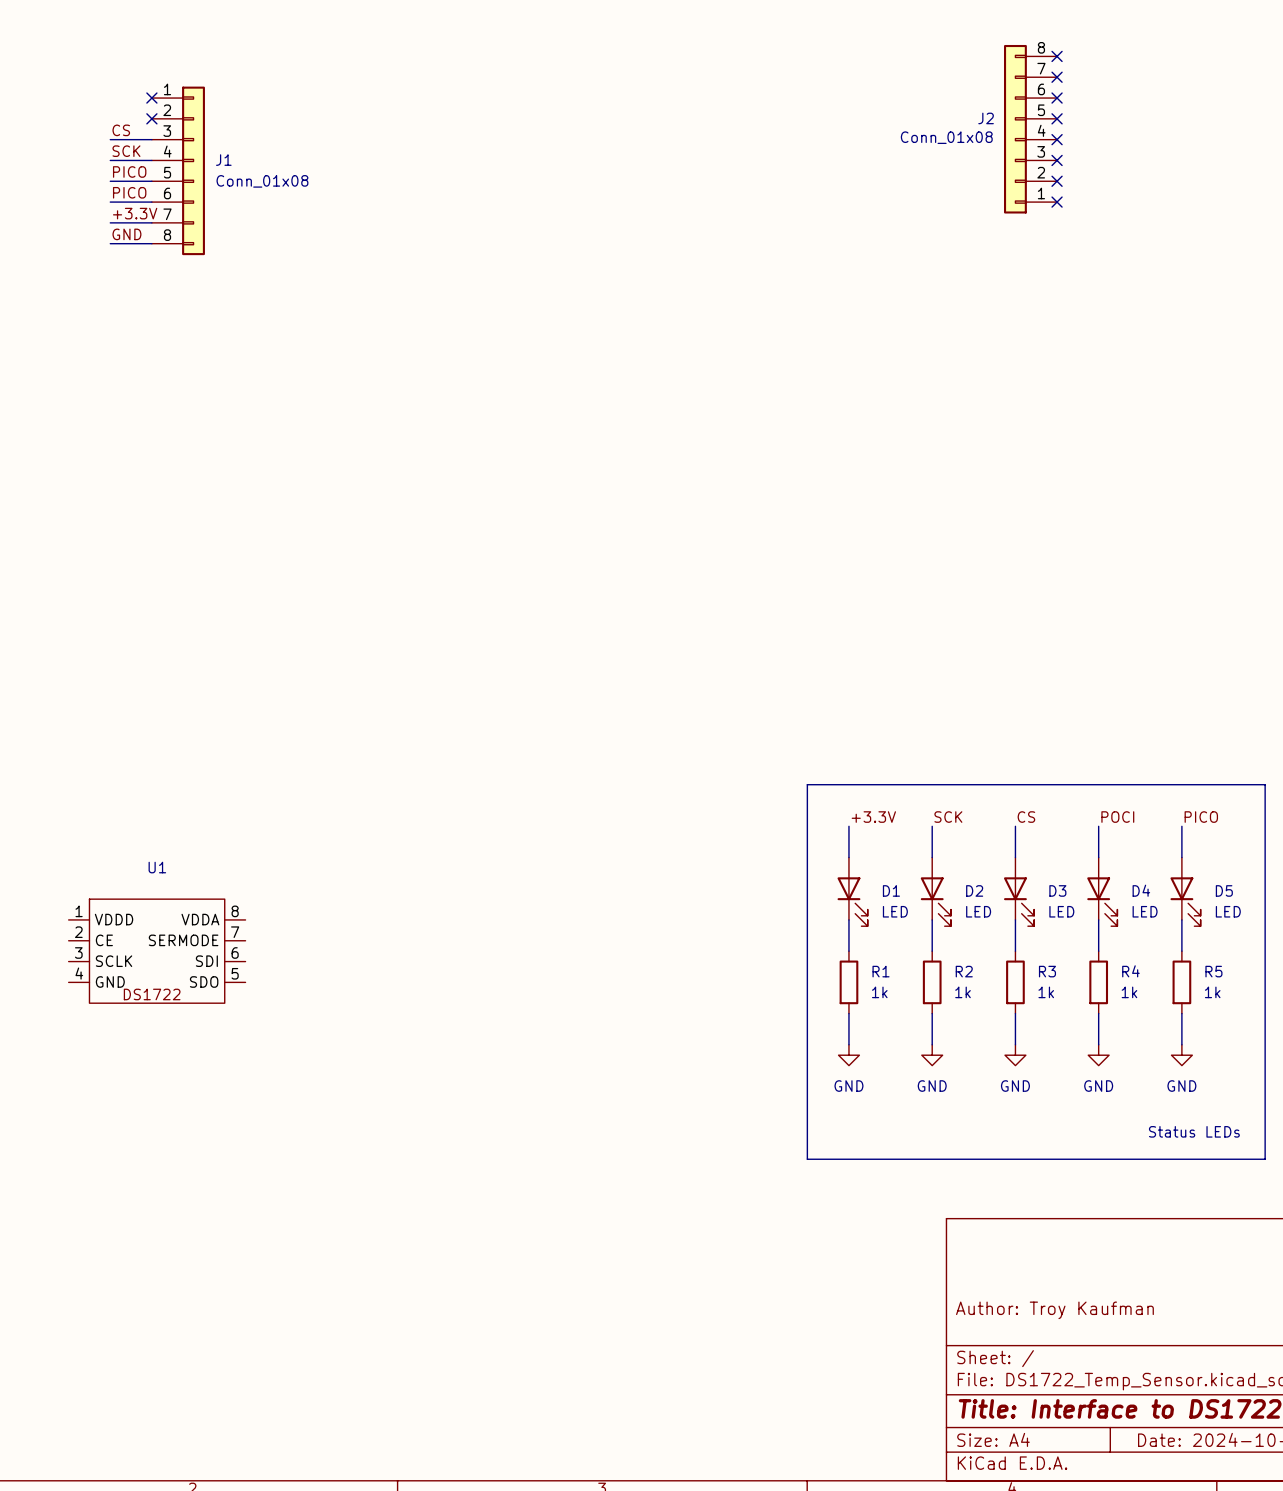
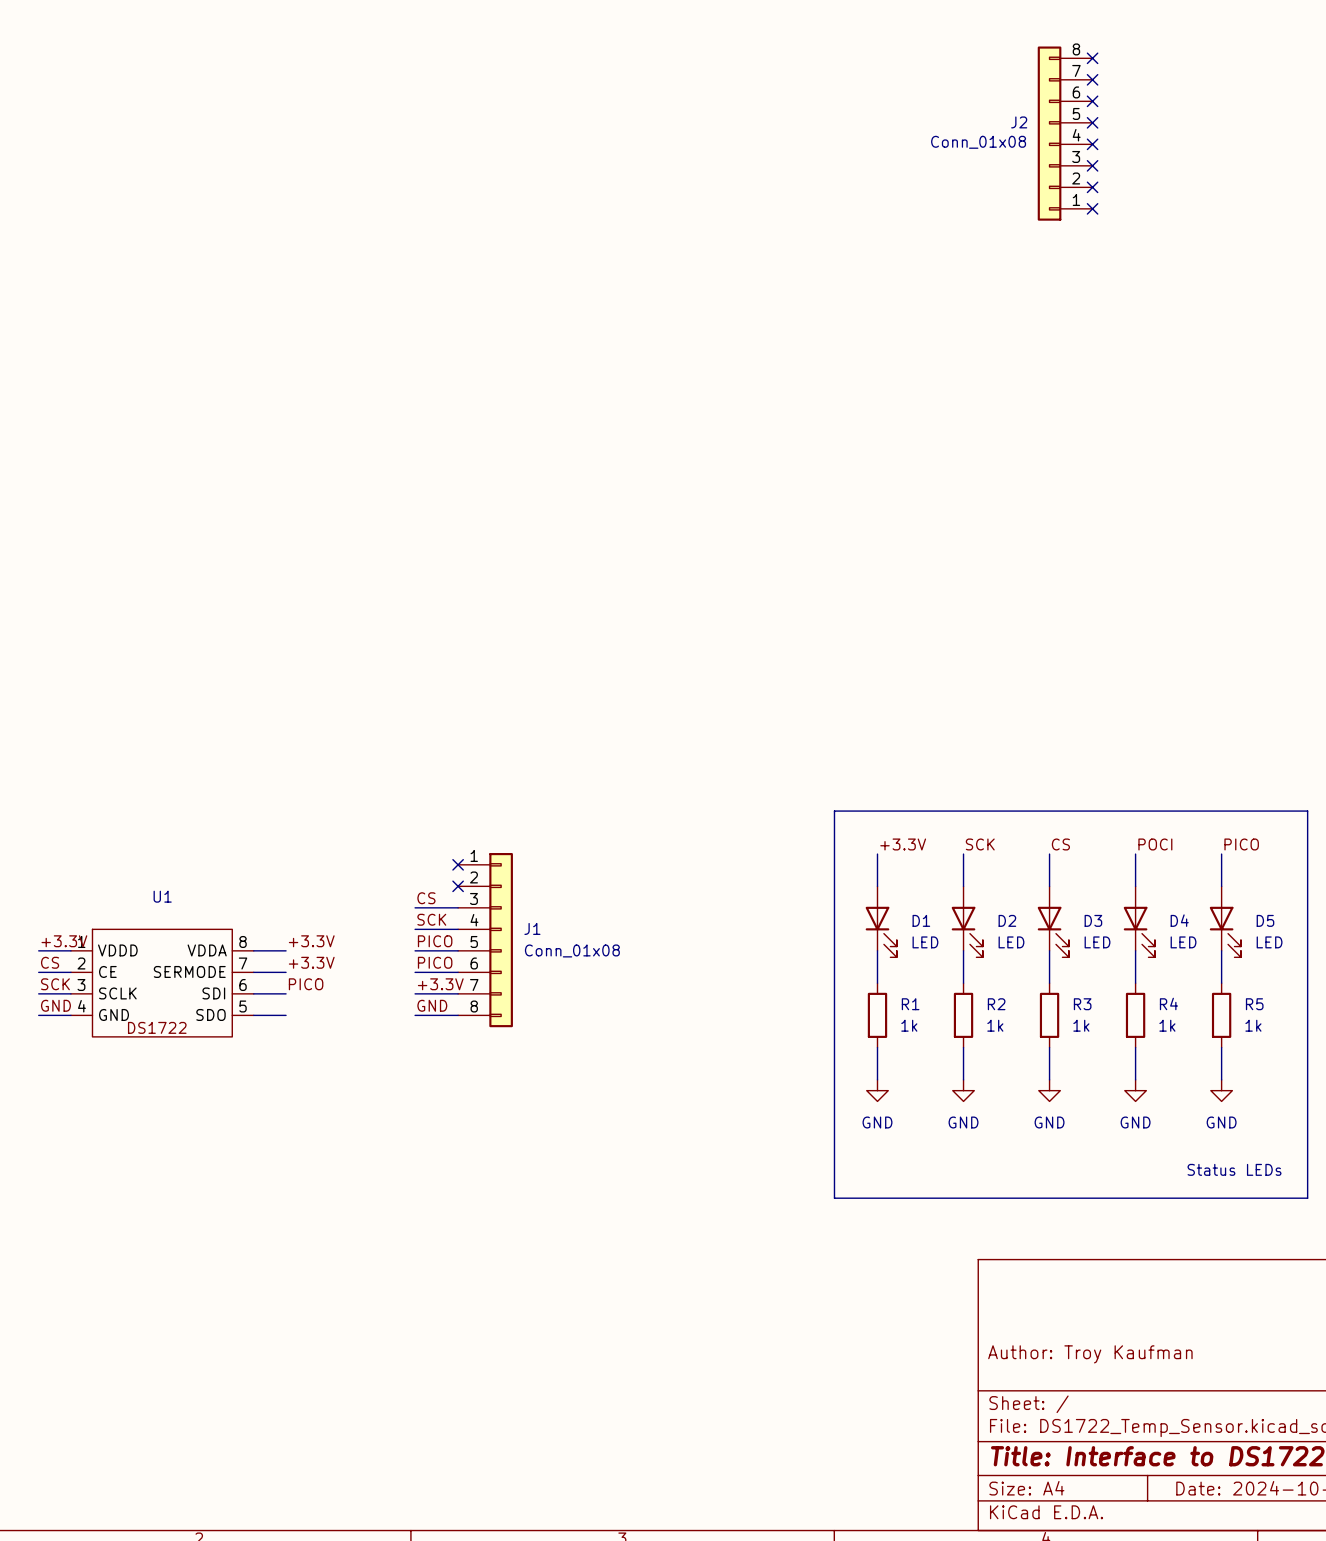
no-connect mark: (151, 98) -> none
no-connect mark: (151, 118) -> none
label: CS (121, 130) -> none
wire: (110, 139) (151, 139) -> none
label: SCK (126, 151) -> none
wire: (110, 160) (151, 160) -> none
J1 position: (178, 170) -> (485, 940)
label: PICO (129, 171) -> none
wire: (110, 181) (151, 181) -> none
label: PICO (129, 192) -> none
wire: (110, 202) (151, 202) -> none
label: +3.3V (135, 213) -> none
wire: (110, 222) (151, 222) -> none
label: GND (126, 234) -> none
wire: (110, 243) (151, 243) -> none
no-connect mark: none -> (458, 864)
no-connect mark: none -> (458, 886)
label: none -> CS (426, 898)
wire: none -> (415, 907) (458, 907)
label: none -> SCK (431, 919)
wire: none -> (415, 929) (458, 929)
label: none -> +3.3V (64, 941)
label: none -> +3.3V (311, 941)
label: none -> PICO (435, 941)
wire: none -> (38, 950) (70, 950)
wire: none -> (253, 950) (286, 950)
wire: none -> (415, 950) (458, 950)
label: none -> CS (50, 962)
label: none -> +3.3V (311, 962)
label: none -> PICO (435, 962)
wire: none -> (38, 972) (70, 972)
wire: none -> (253, 972) (286, 972)
wire: none -> (415, 972) (458, 972)
label: none -> SCK (55, 984)
label: none -> PICO (306, 984)
label: none -> +3.3V (440, 984)
wire: none -> (38, 993) (70, 993)
wire: none -> (253, 993) (286, 993)
wire: none -> (415, 993) (458, 993)
label: none -> GND (55, 1005)
label: none -> GND (432, 1005)
wire: none -> (38, 1015) (70, 1015)
wire: none -> (253, 1015) (286, 1015)
wire: none -> (415, 1015) (458, 1015)

